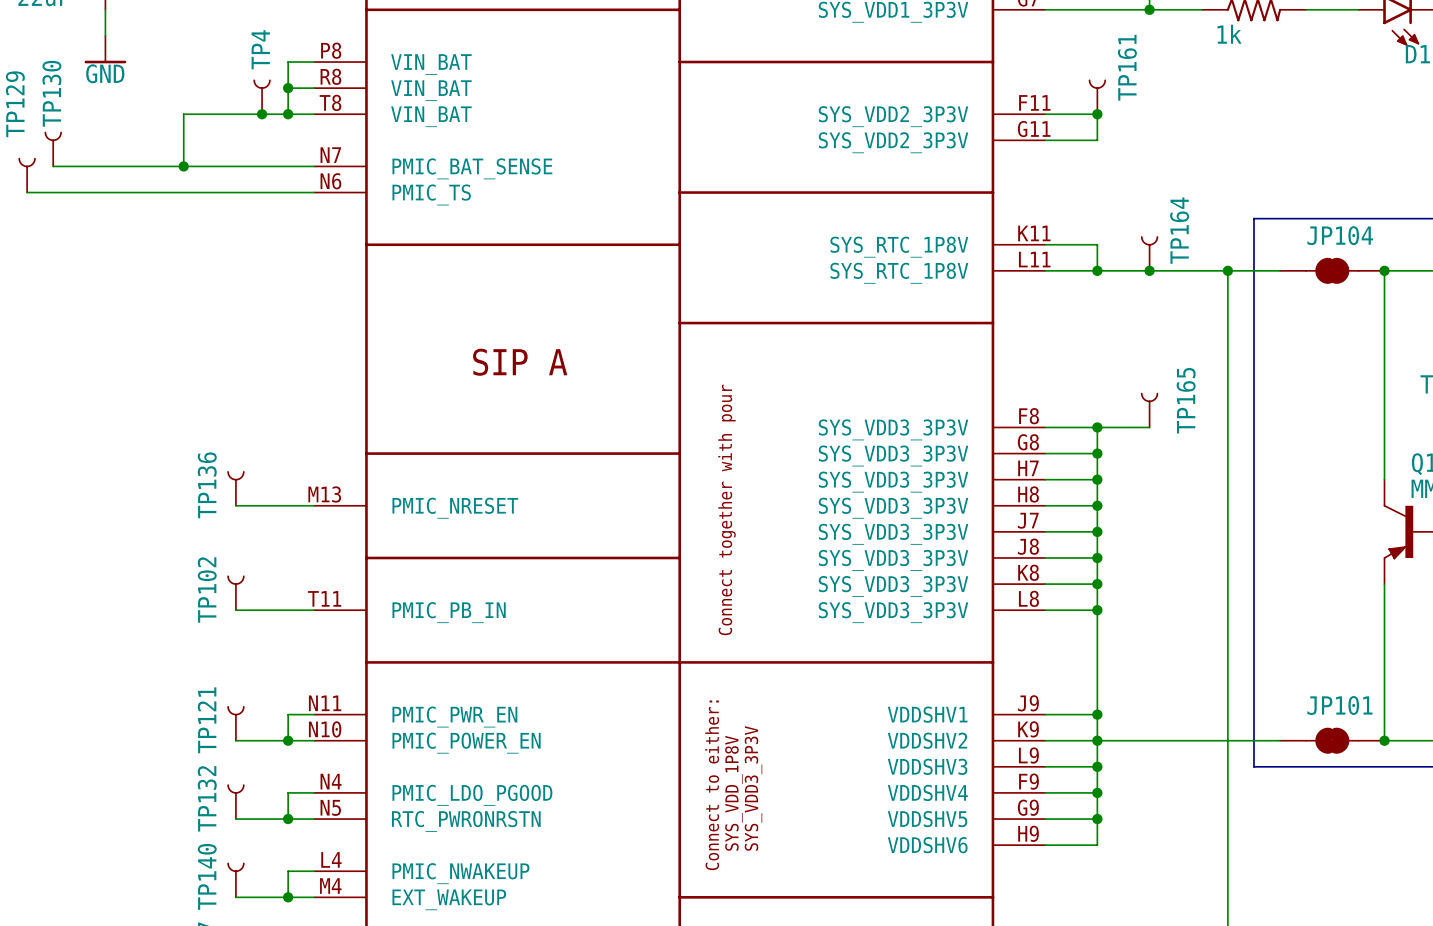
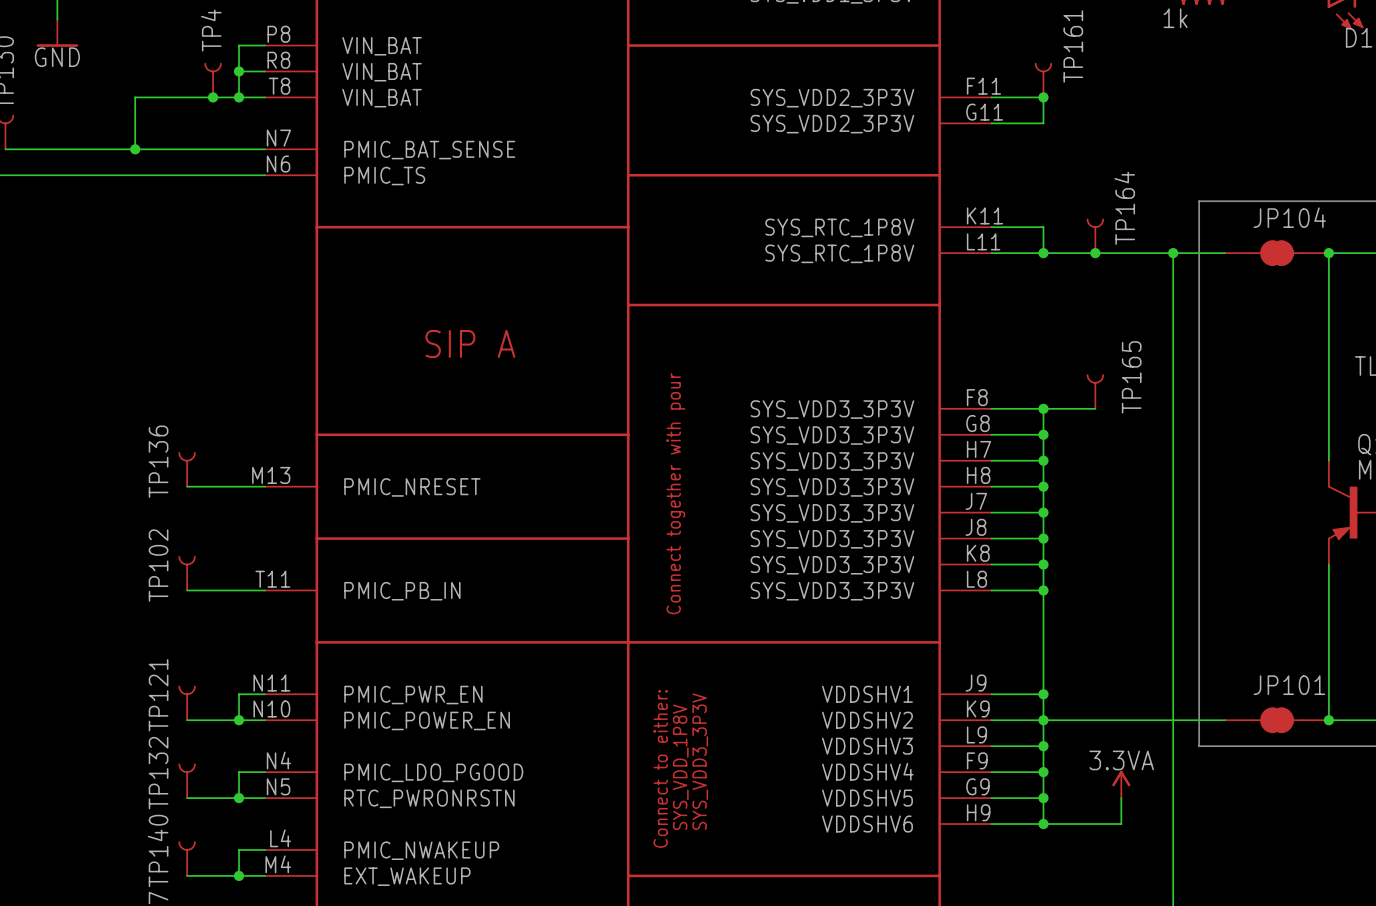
power symbol: none -> 3.3VA (1121, 784)
wire: none -> (1121, 798) (1121, 824) (1043, 824)
junction: none -> (1043, 824)

